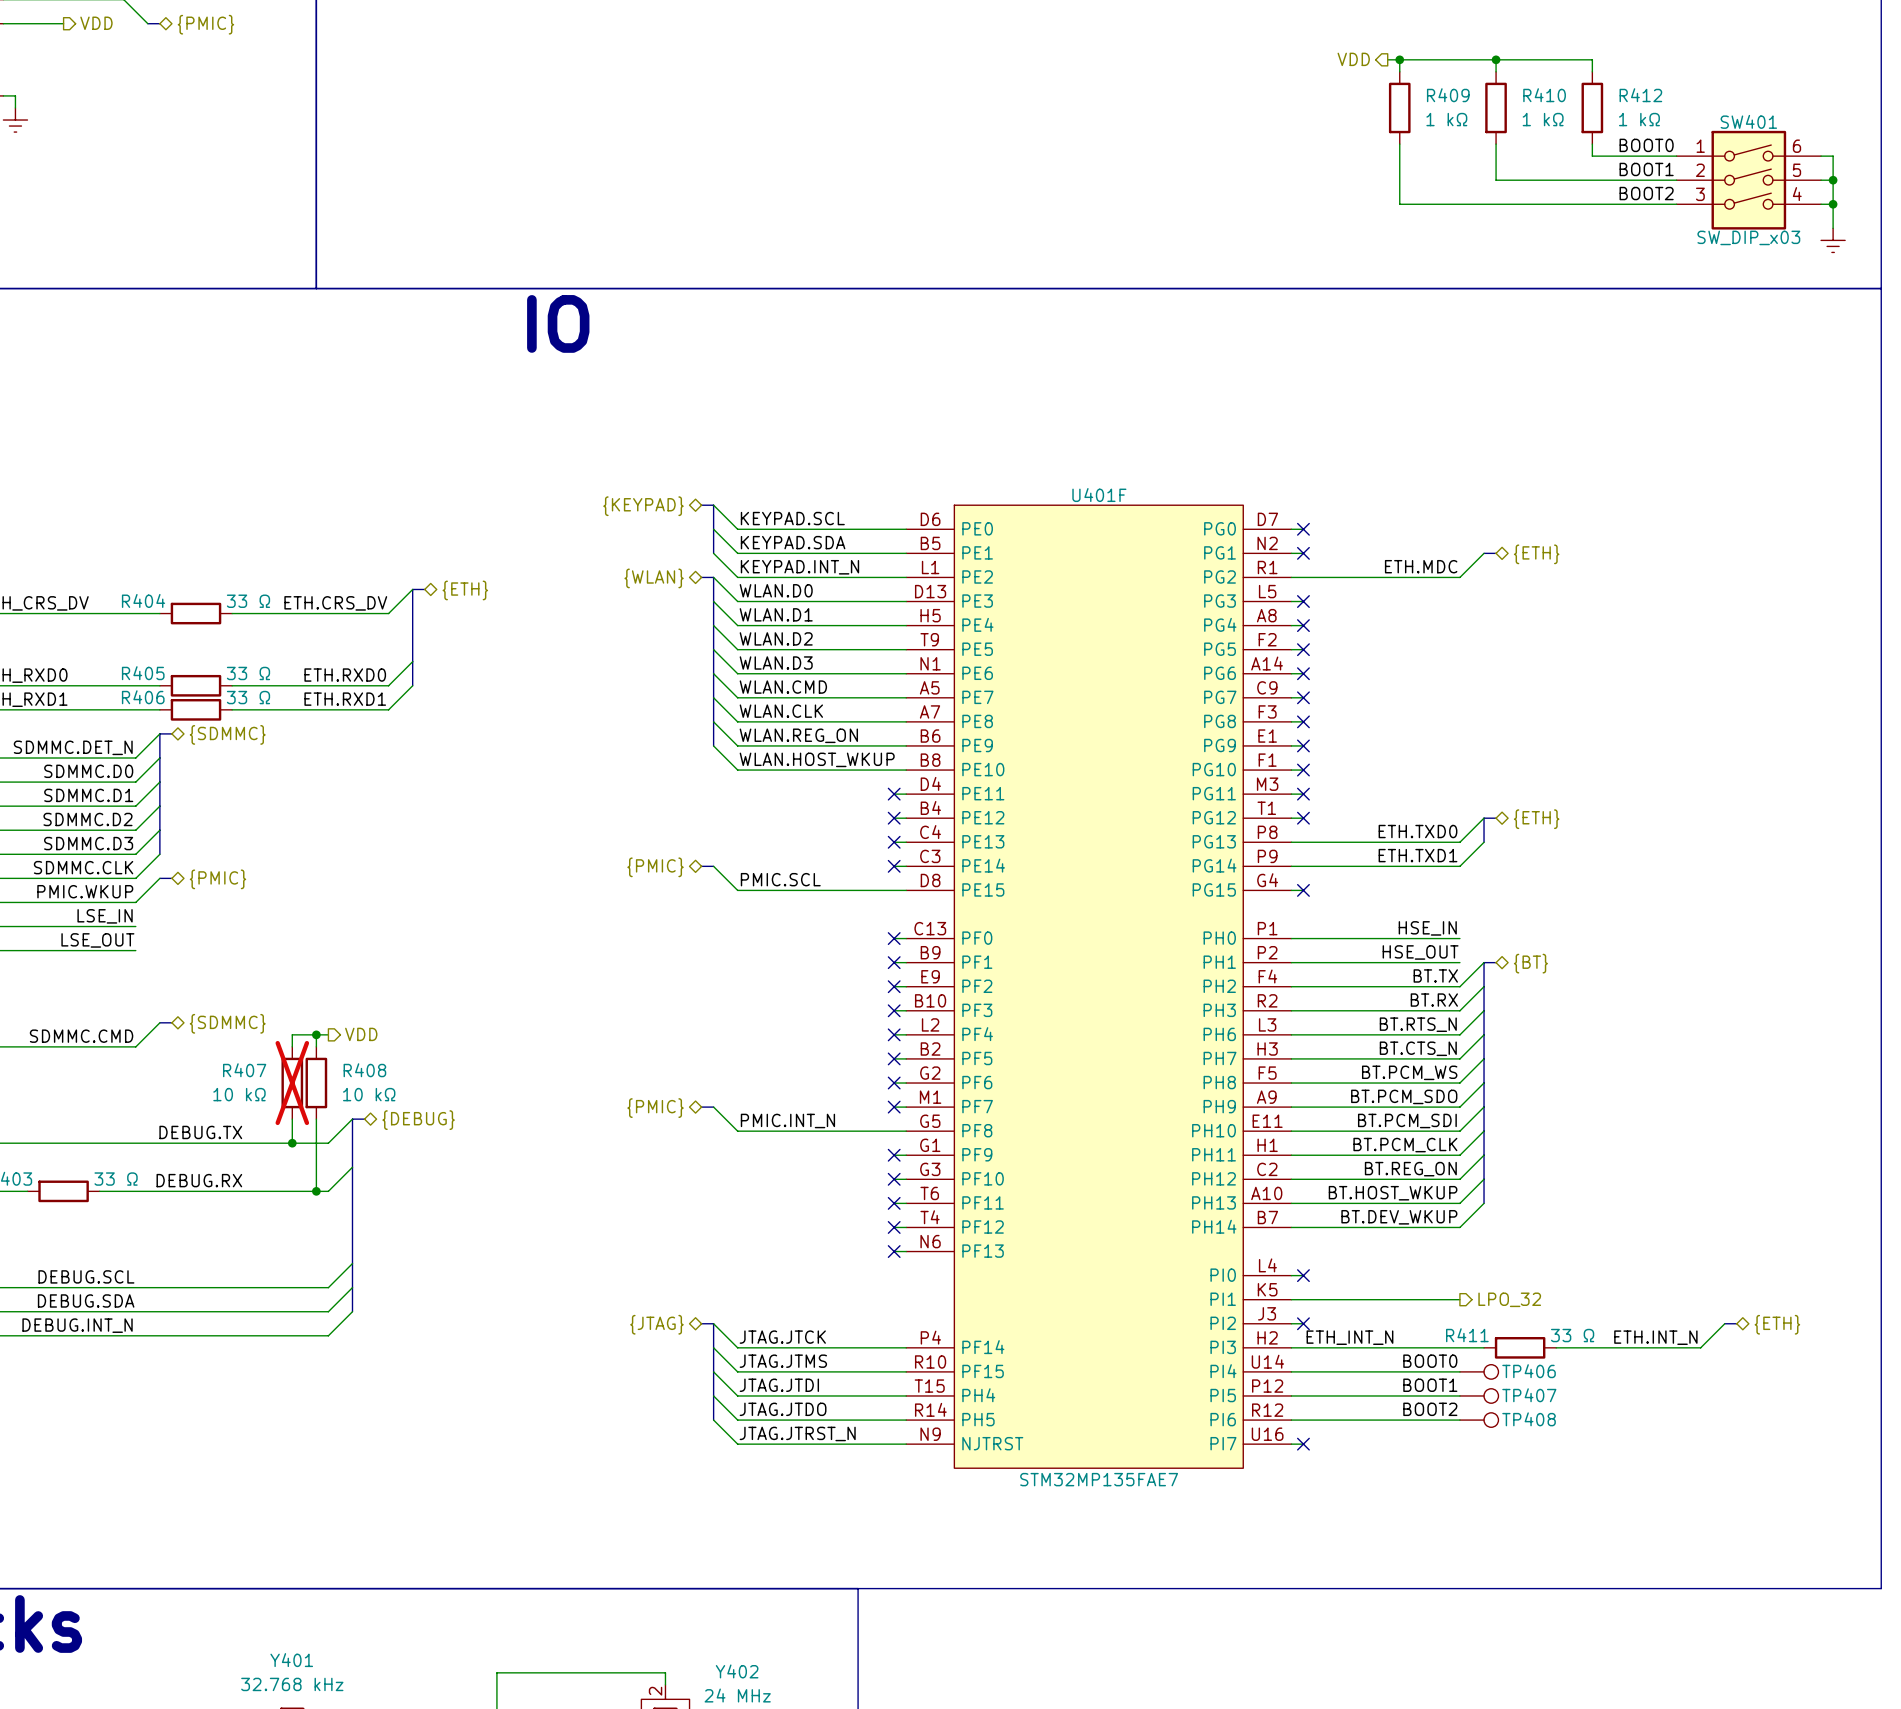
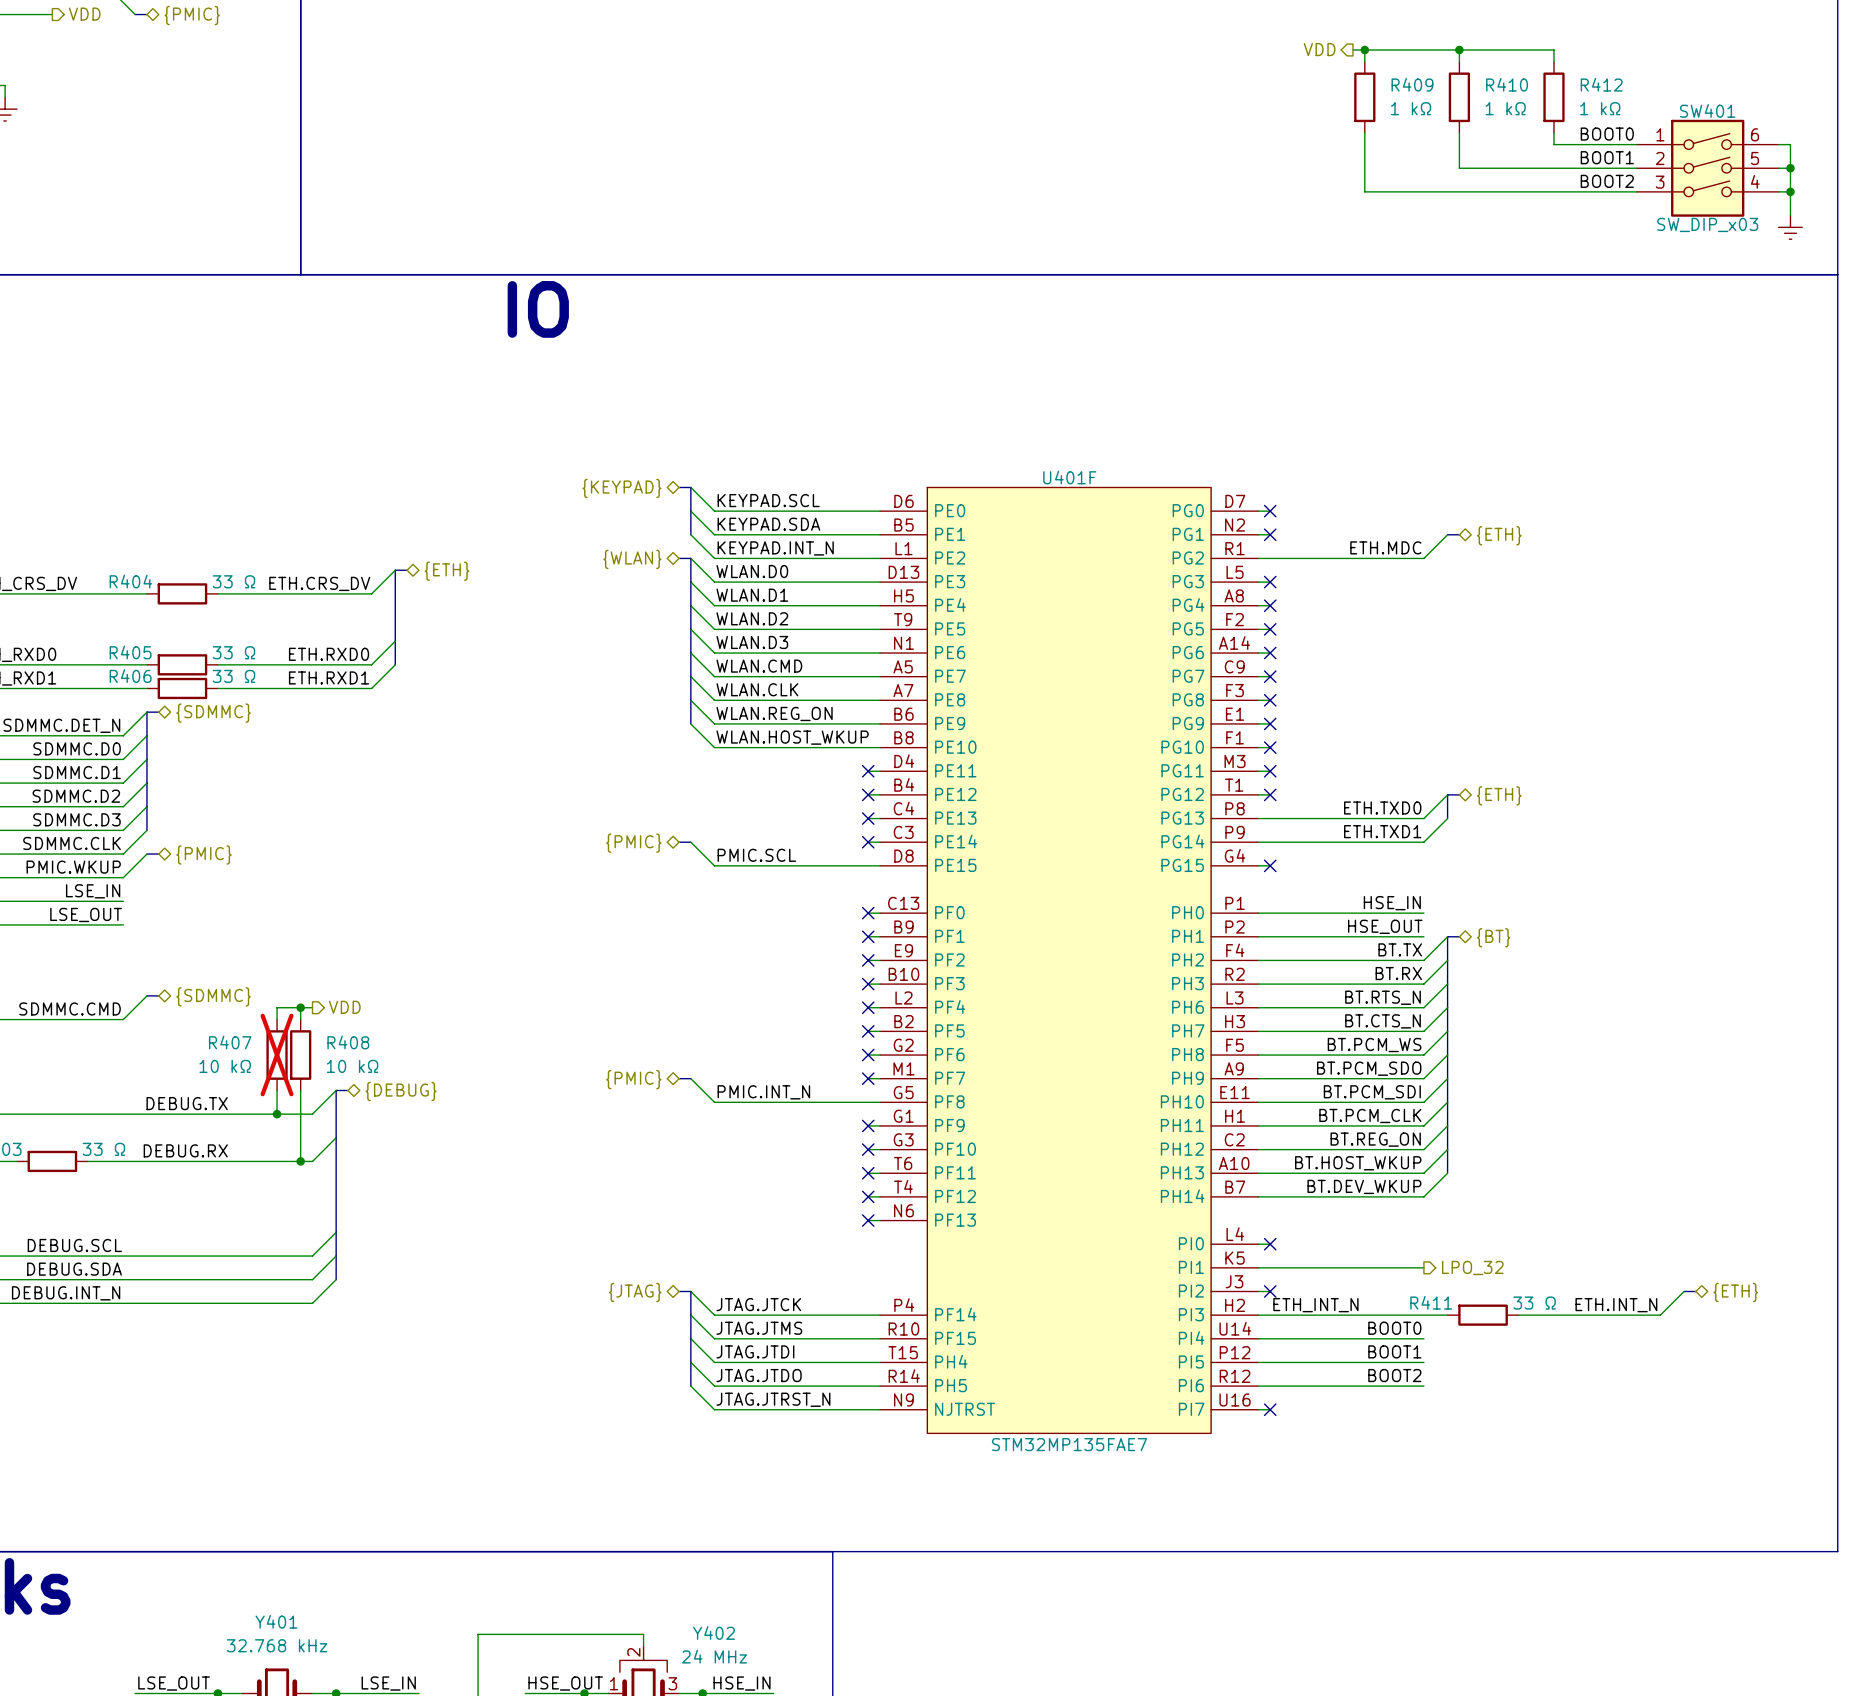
TP406: (1479, 1371) -> none
TP407: (1479, 1395) -> none
TP408: (1479, 1420) -> none

